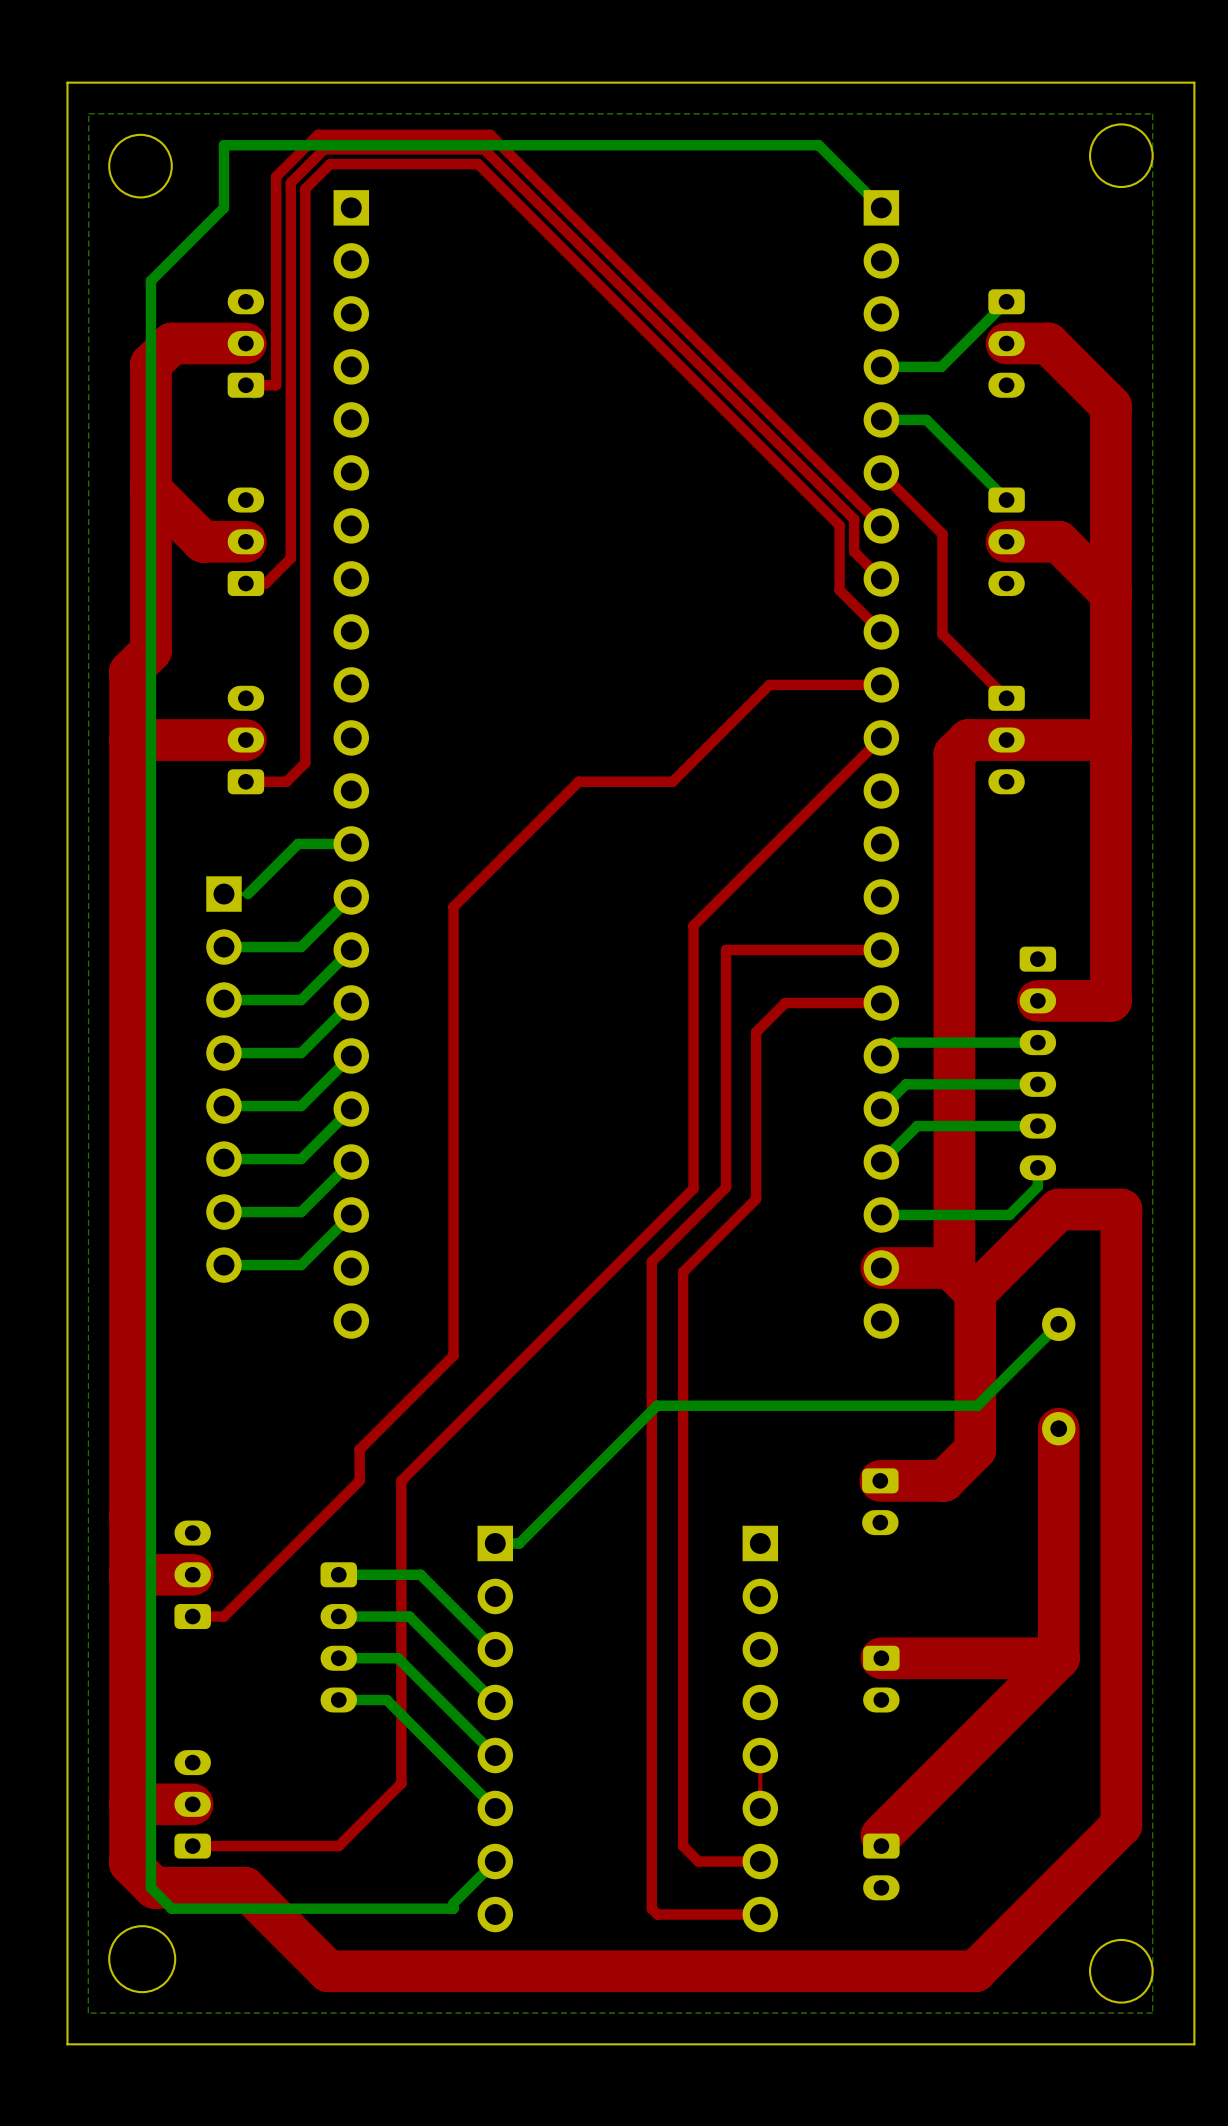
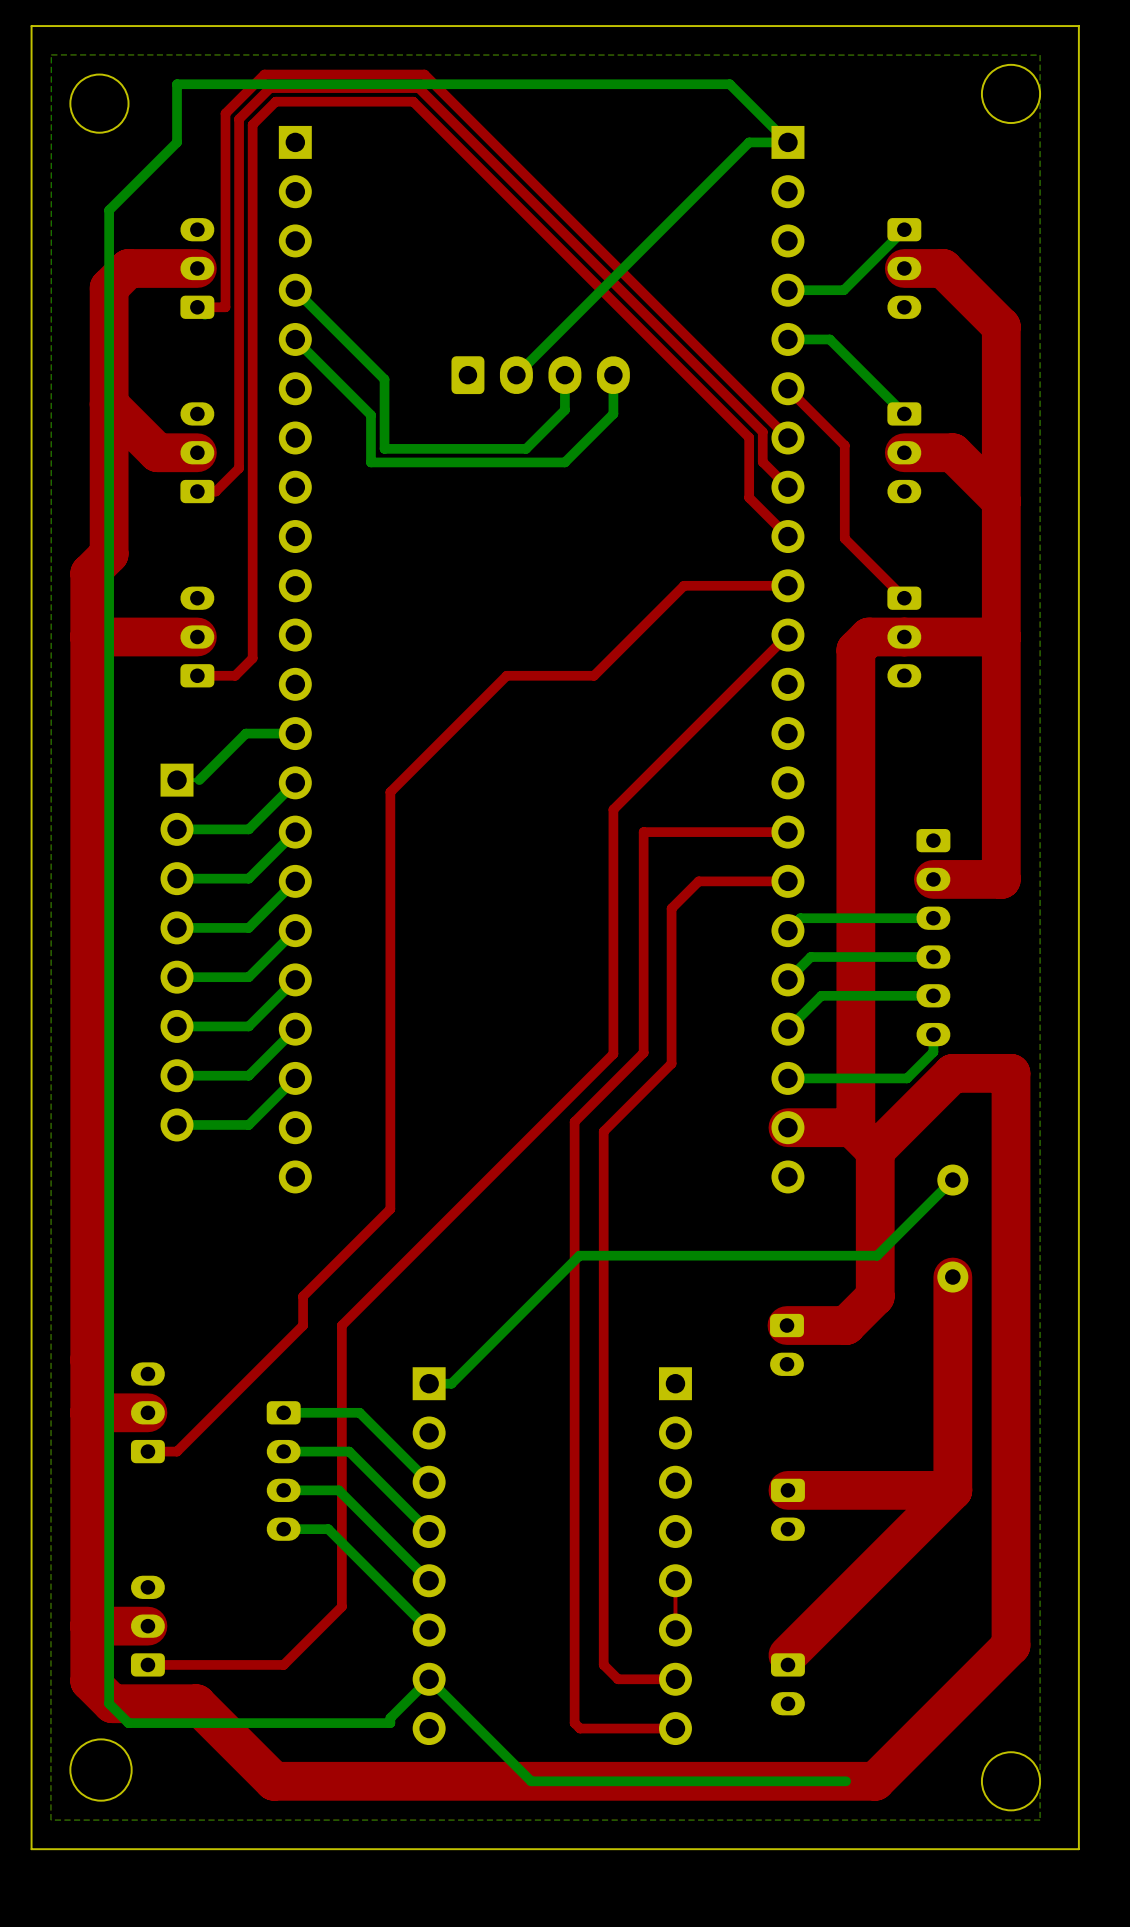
bottom track: none -> (787, 142) (749, 142) (516, 375)
bottom track: none -> (295, 290) (384, 379) (384, 448) (526, 448) (564, 410) (564, 375)
bottom track: none -> (295, 339) (370, 415) (370, 462) (564, 462) (613, 413) (613, 375)
part: none -> (540, 375)
bottom track: none -> (429, 1679) (531, 1781) (846, 1781)

